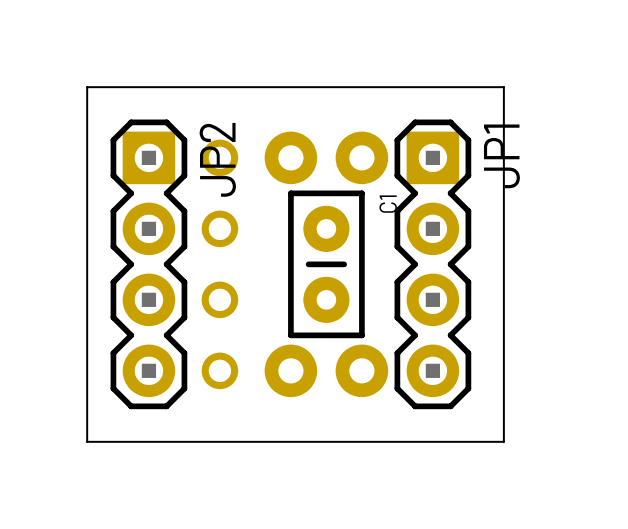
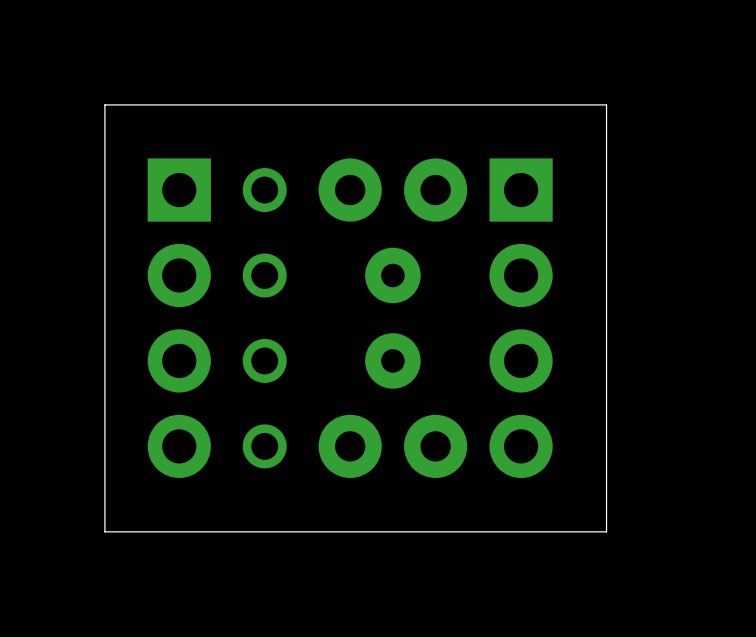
JP2 side: bottom (148, 264) -> top (179, 318)
C1 side: bottom (326, 264) -> top (392, 318)
JP1 side: bottom (432, 264) -> top (521, 318)

